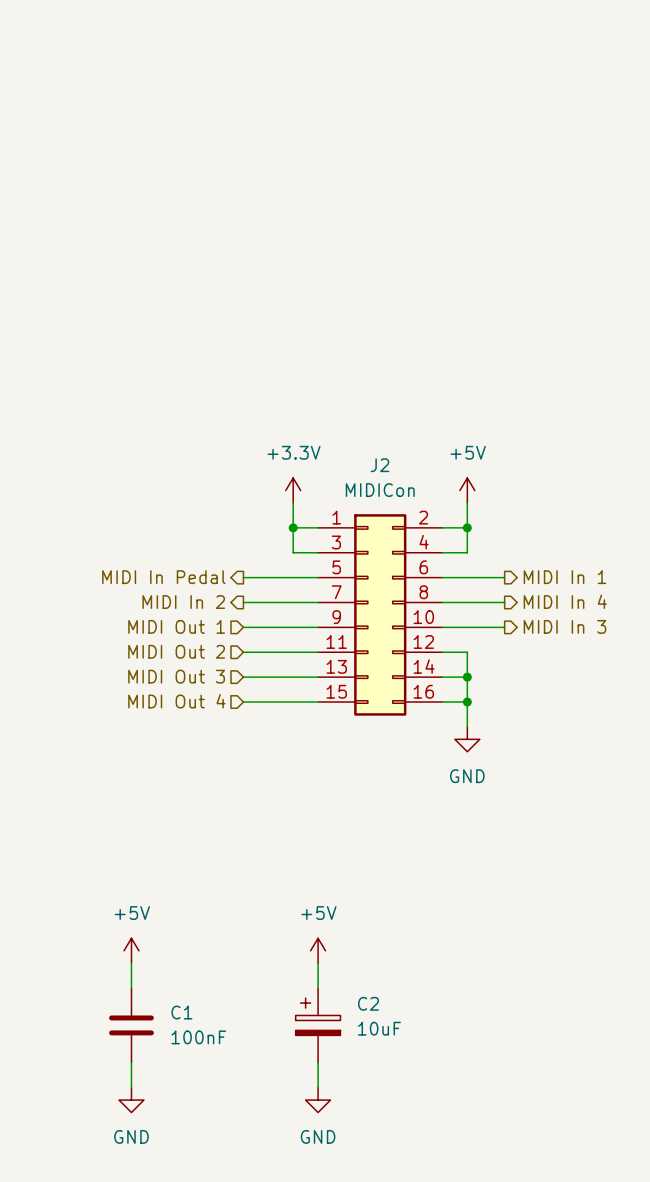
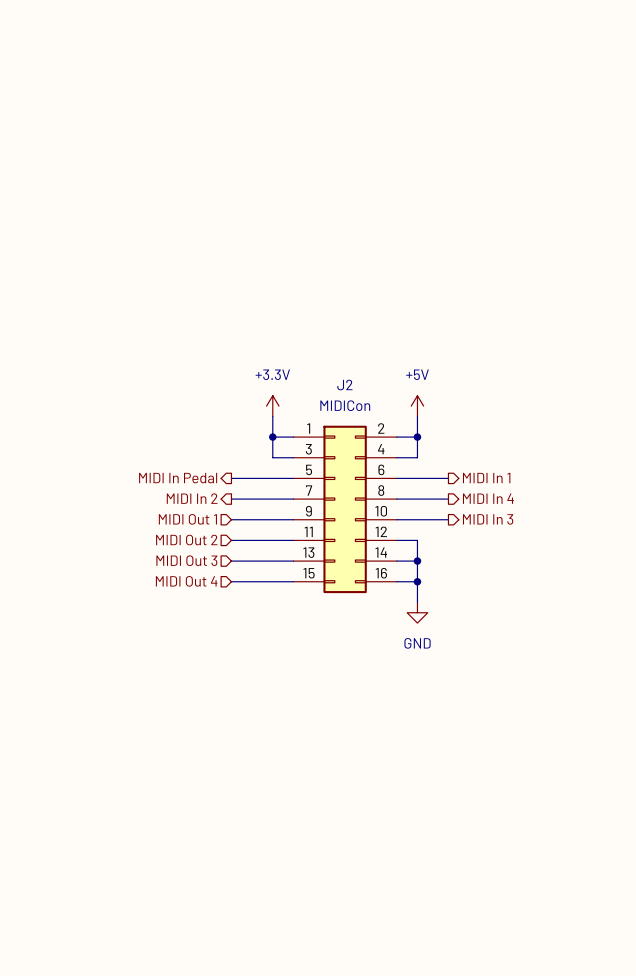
power symbol: +5V (131, 950) -> none
power symbol: +5V (318, 950) -> none
wire: (131, 963) (131, 988) -> none
wire: (318, 963) (318, 988) -> none
C1: 100nF (131, 1025) -> none
C2: 10uF (318, 1025) -> none
wire: (131, 1062) (131, 1087) -> none
wire: (318, 1062) (318, 1087) -> none
power symbol: GND (131, 1100) -> none
power symbol: GND (318, 1100) -> none

